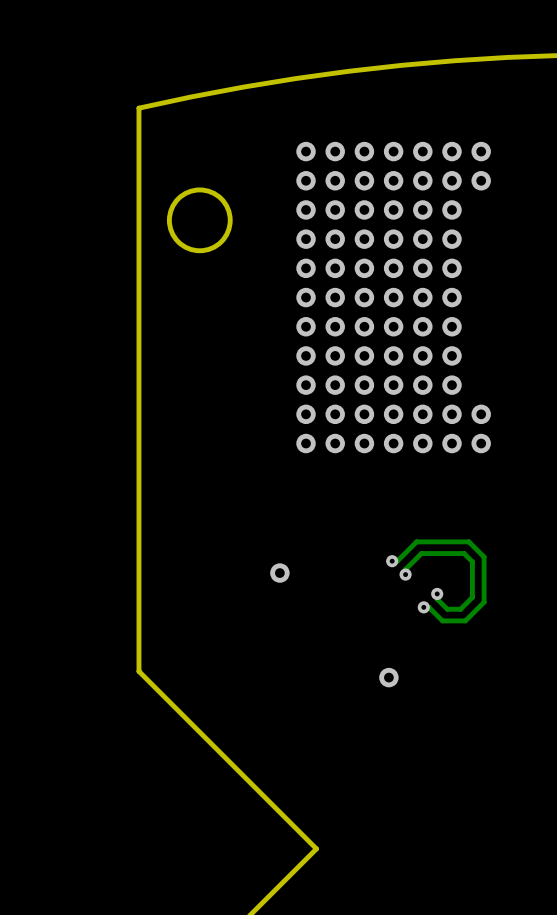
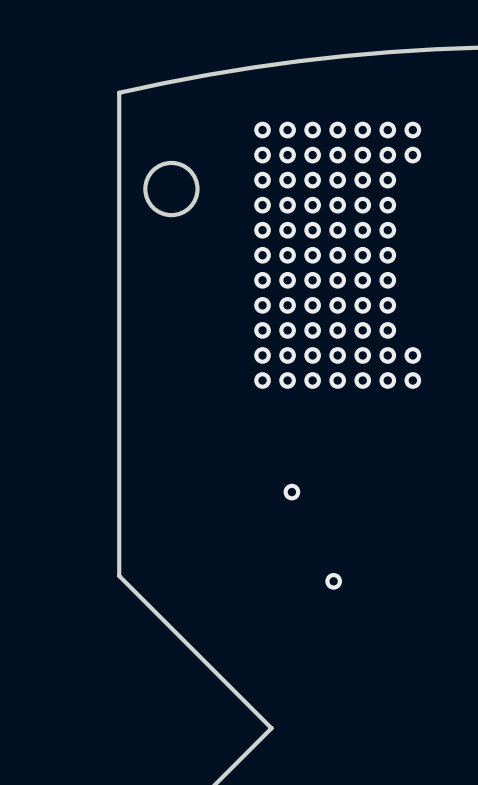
track: (392, 561) (397, 561) (416, 541) (468, 541) (484, 557) (484, 602) (465, 620) (442, 620) (428, 607) (423, 607) -> none
via: (392, 561) -> none
via position: (279, 573) -> (291, 492)
track: (405, 574) (405, 569) (421, 553) (464, 553) (472, 561) (472, 597) (460, 609) (447, 609) (437, 599) (437, 593) -> none
via: (405, 574) -> none
via: (437, 593) -> none
via: (423, 607) -> none

